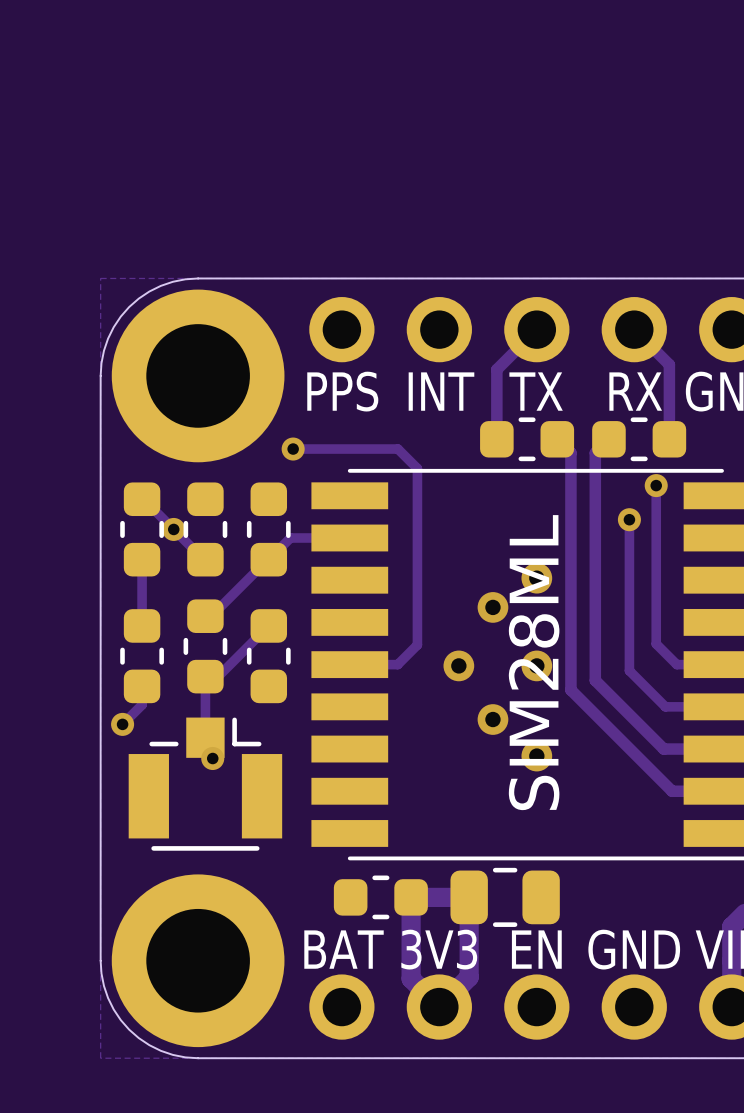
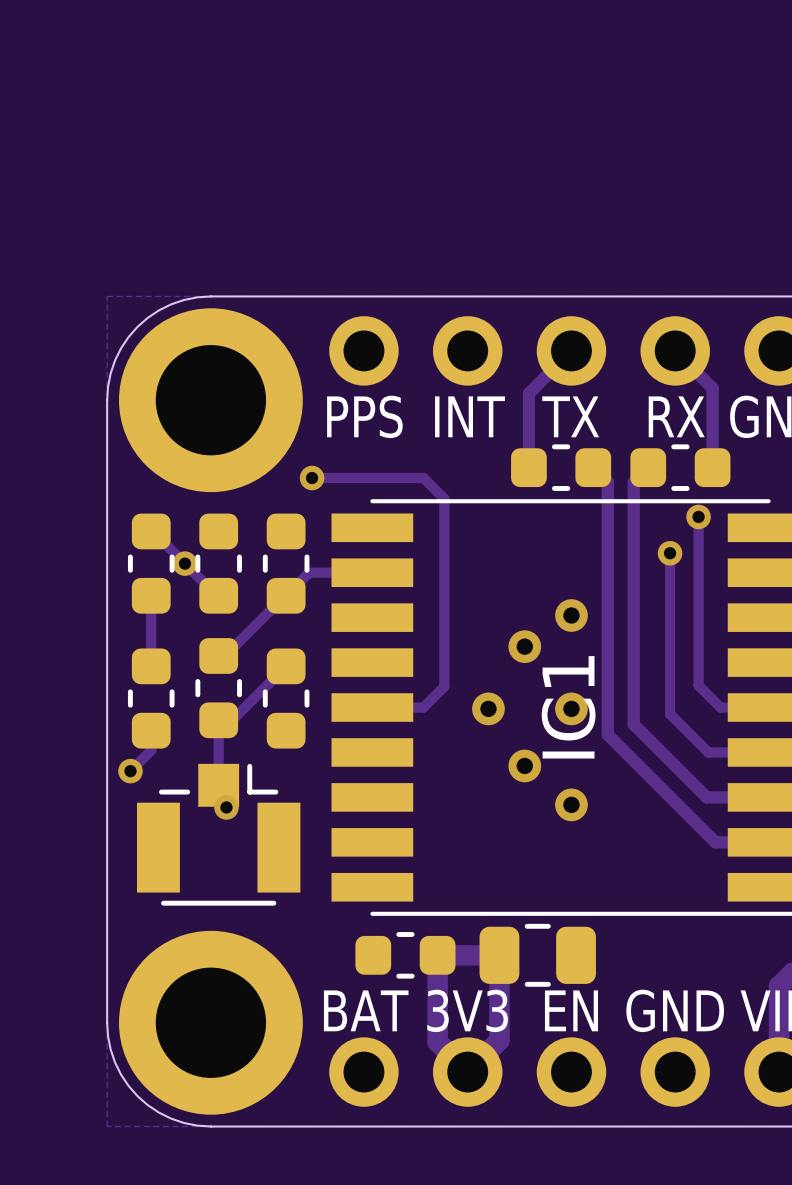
SIM28ML name: SIM28ML (534, 662) -> IC1 (568, 707)

